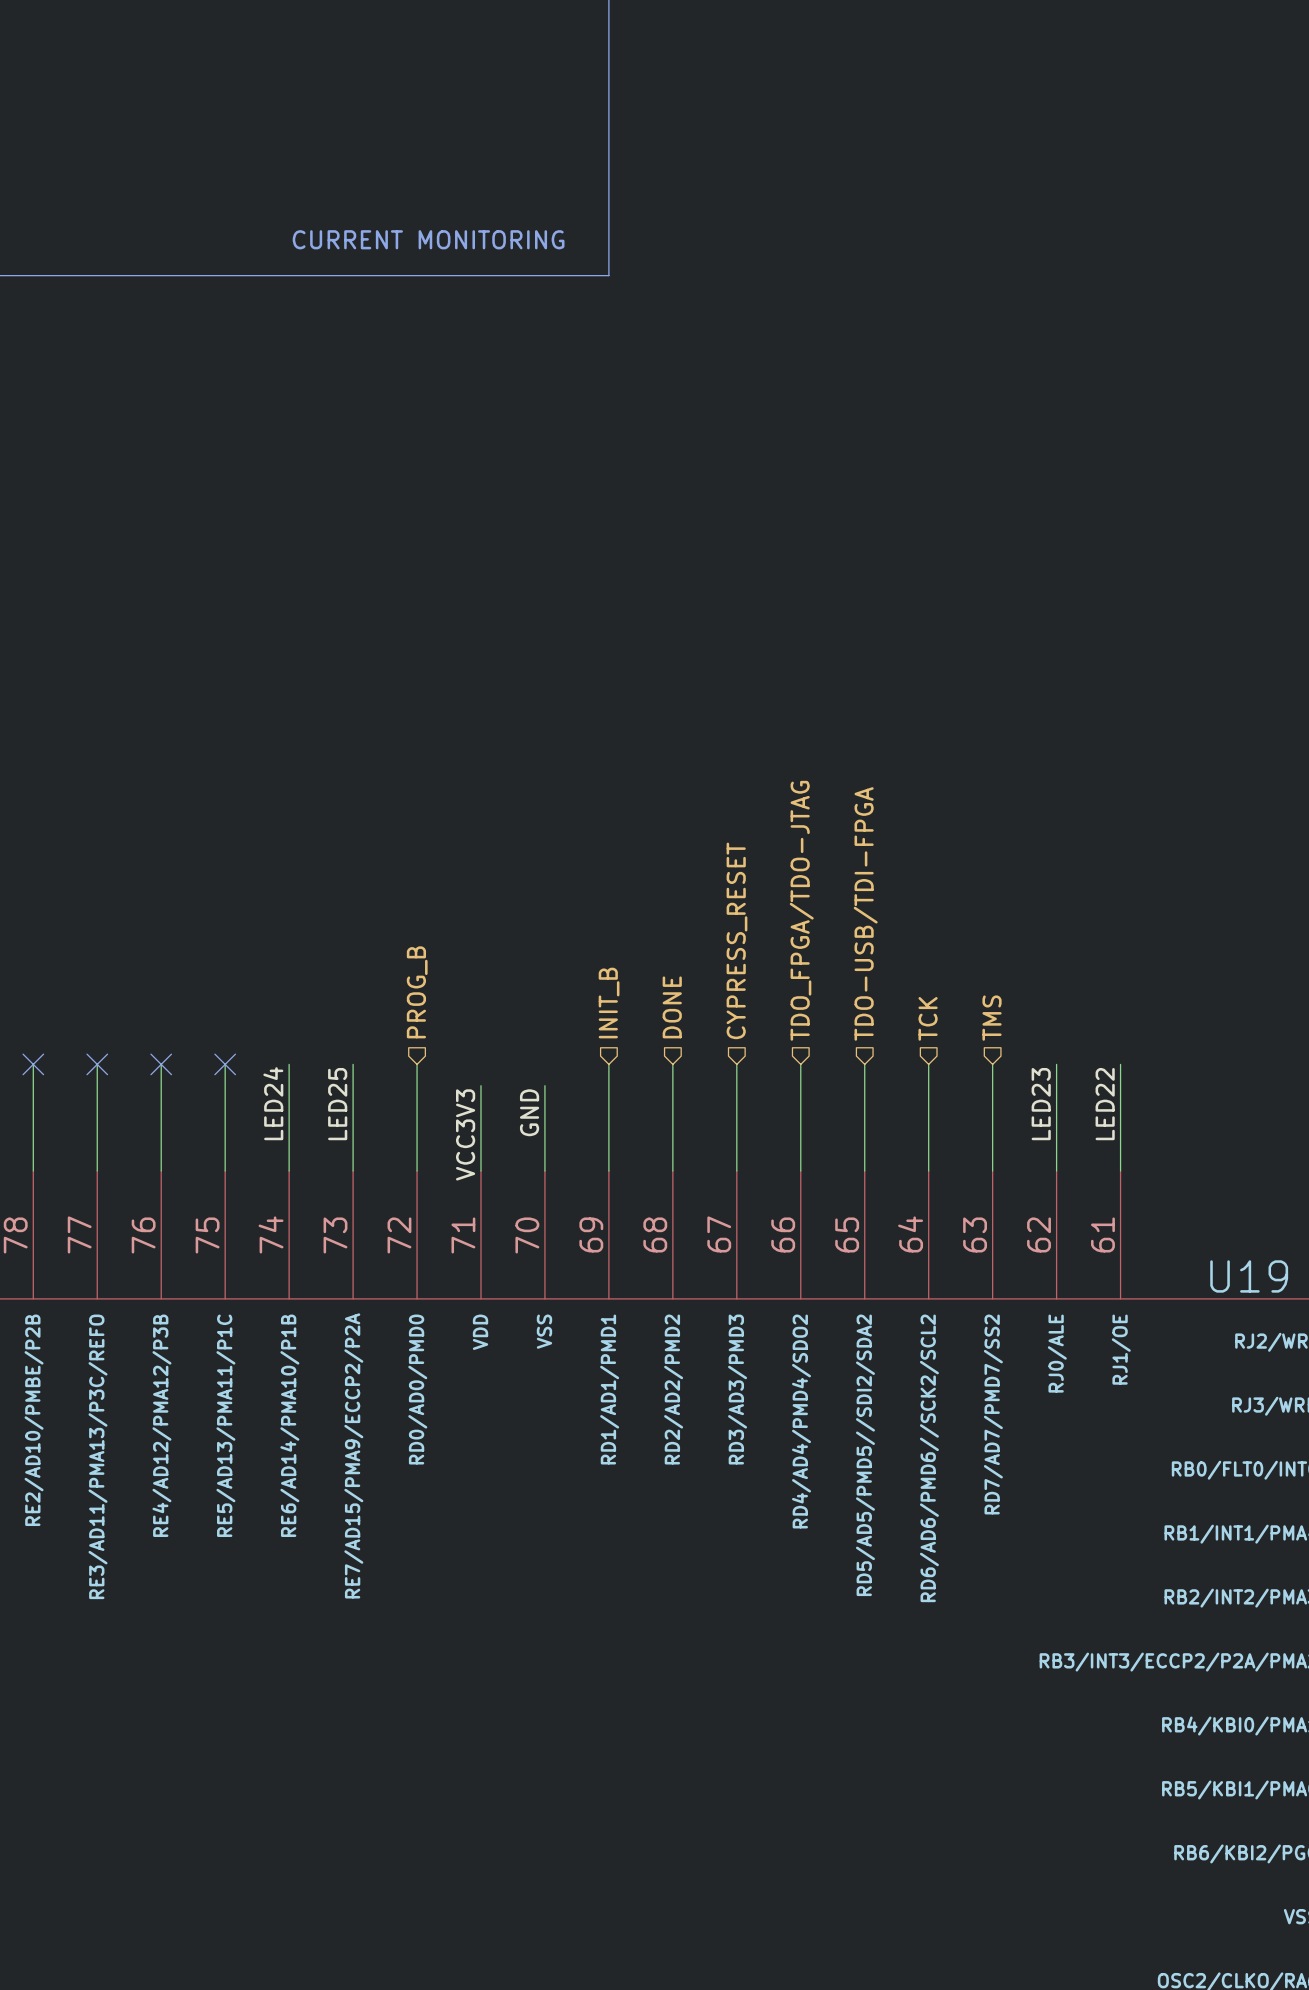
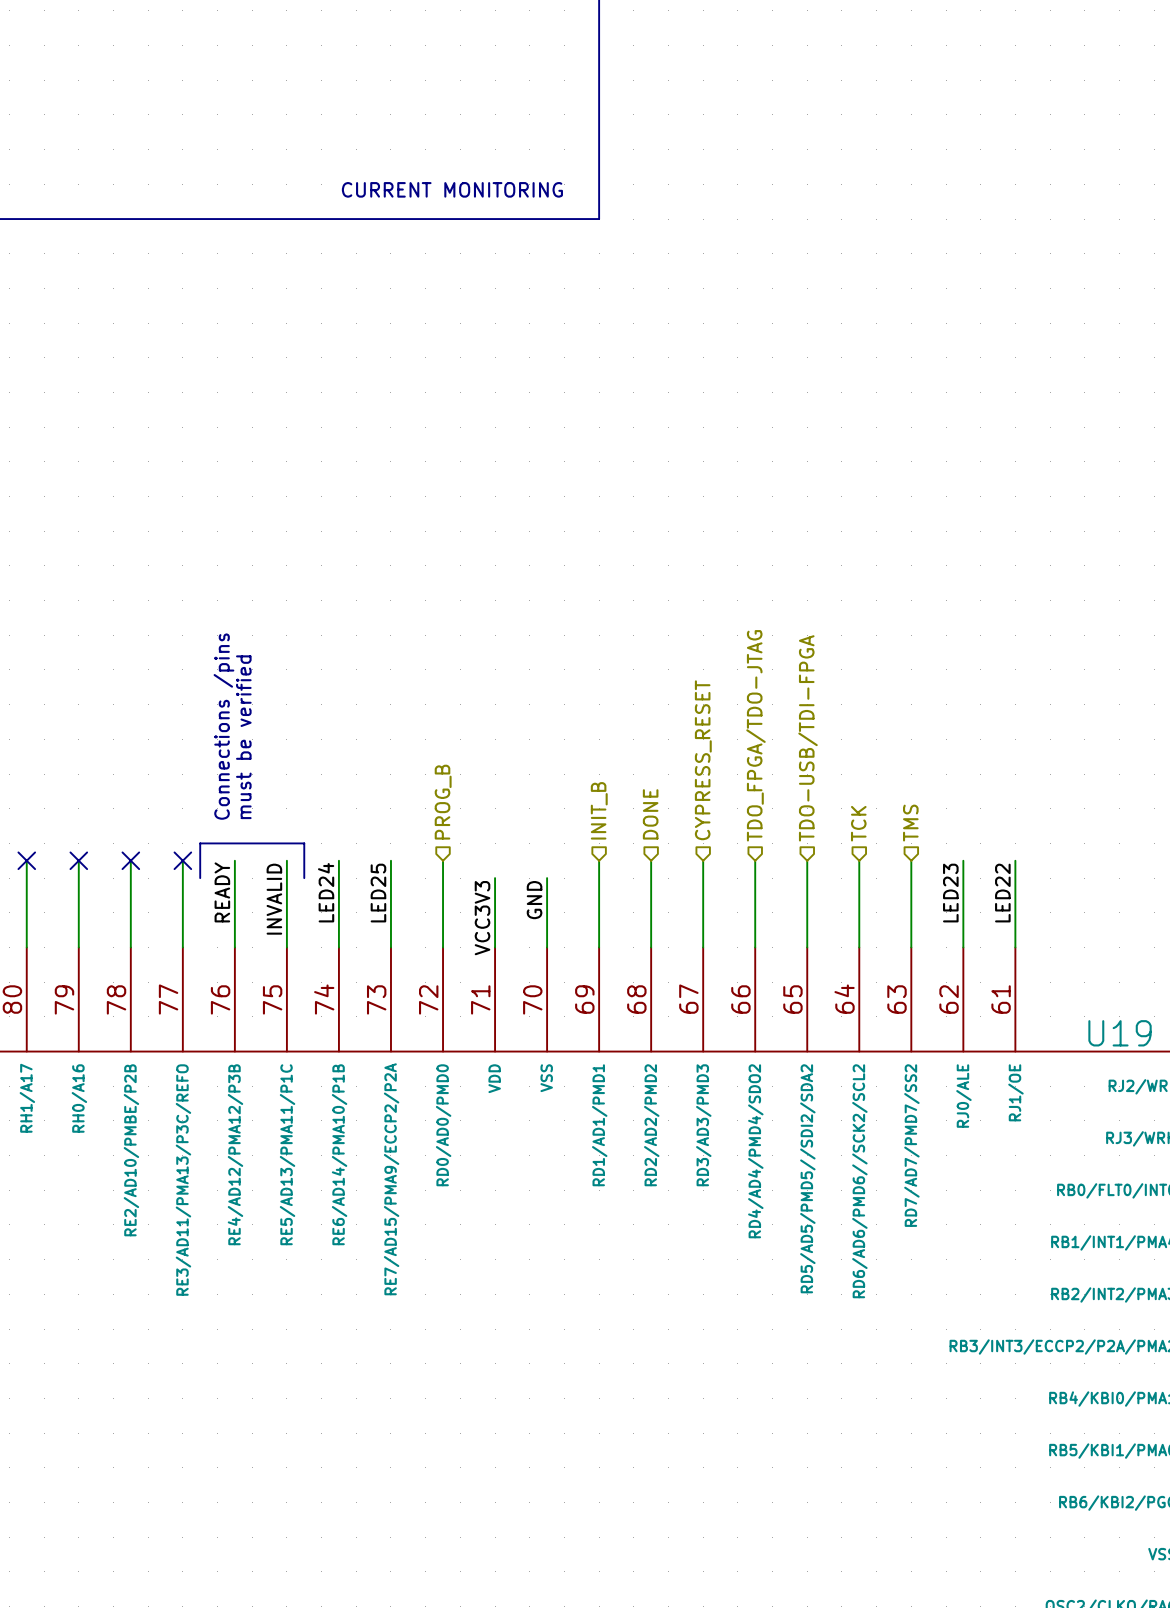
text: none -> Connections /pins (223, 726)
text: none -> must be verified (243, 737)
no-connect mark: (161, 1064) -> none
no-connect mark: (225, 1064) -> none
bus: none -> (200, 878) (200, 843) (304, 843) (304, 878)
label: none -> READY (222, 892)
label: none -> INVALID (274, 899)

